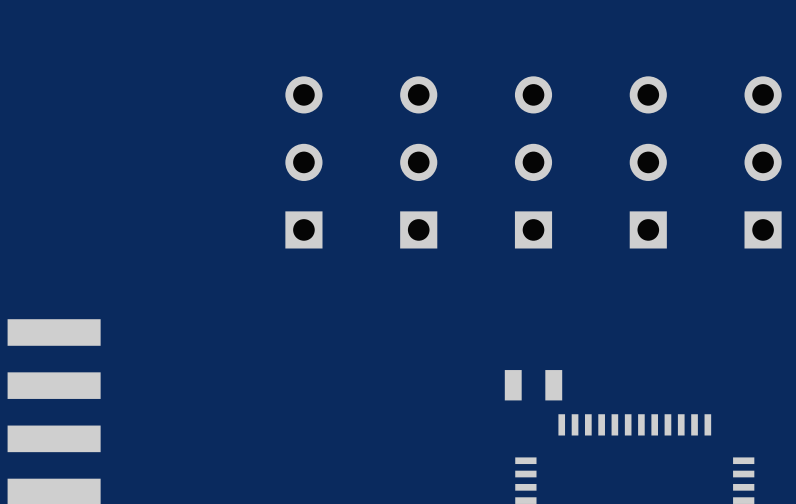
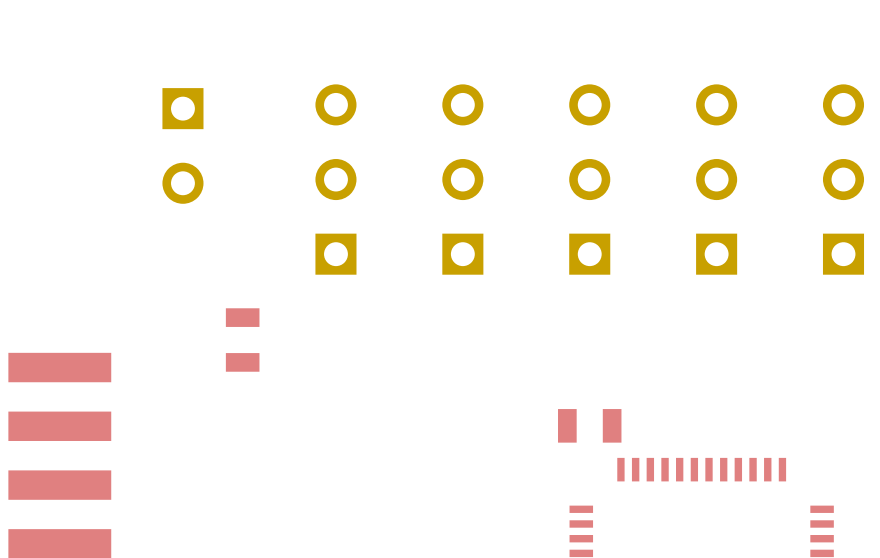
part: none -> (182, 145)
part: none -> (242, 340)

